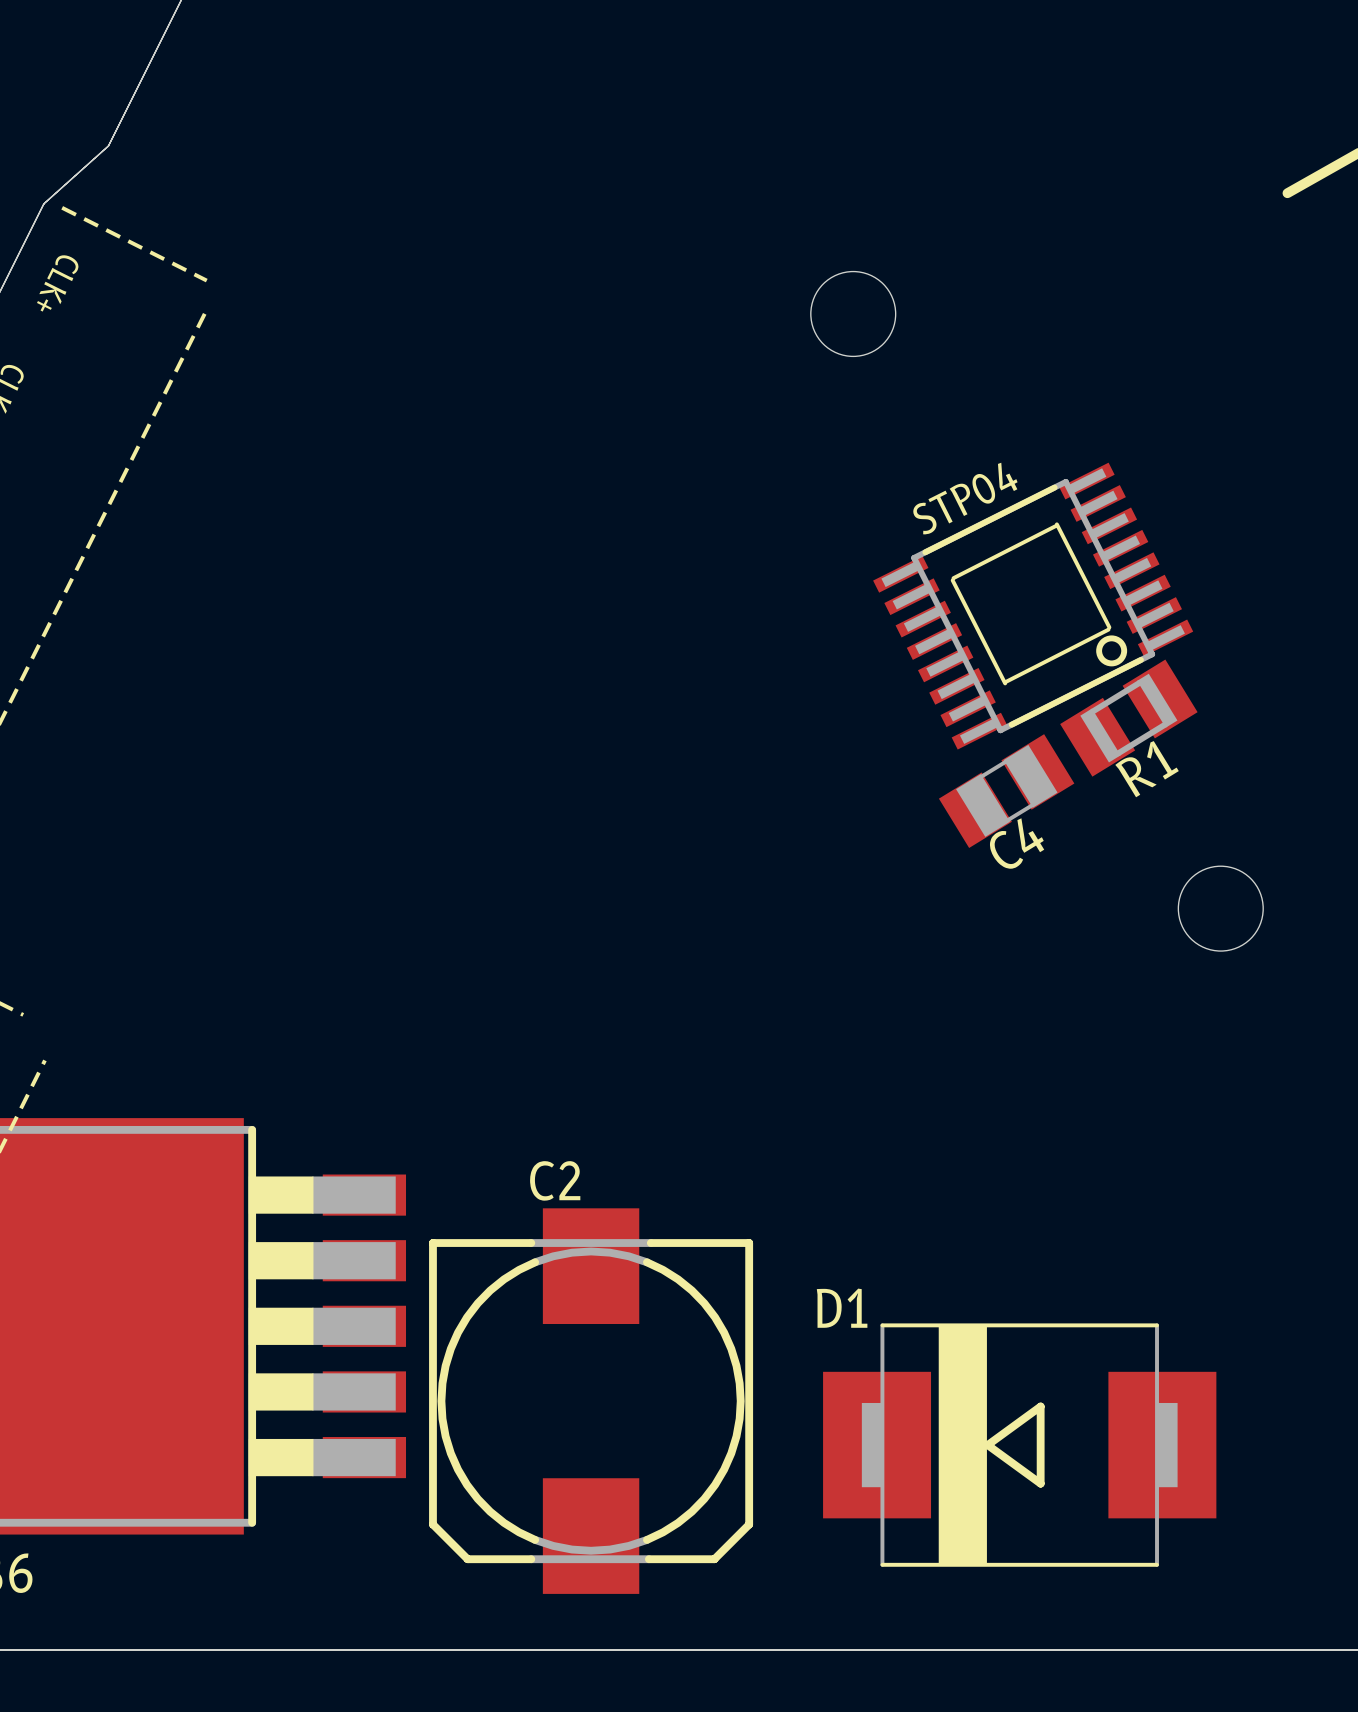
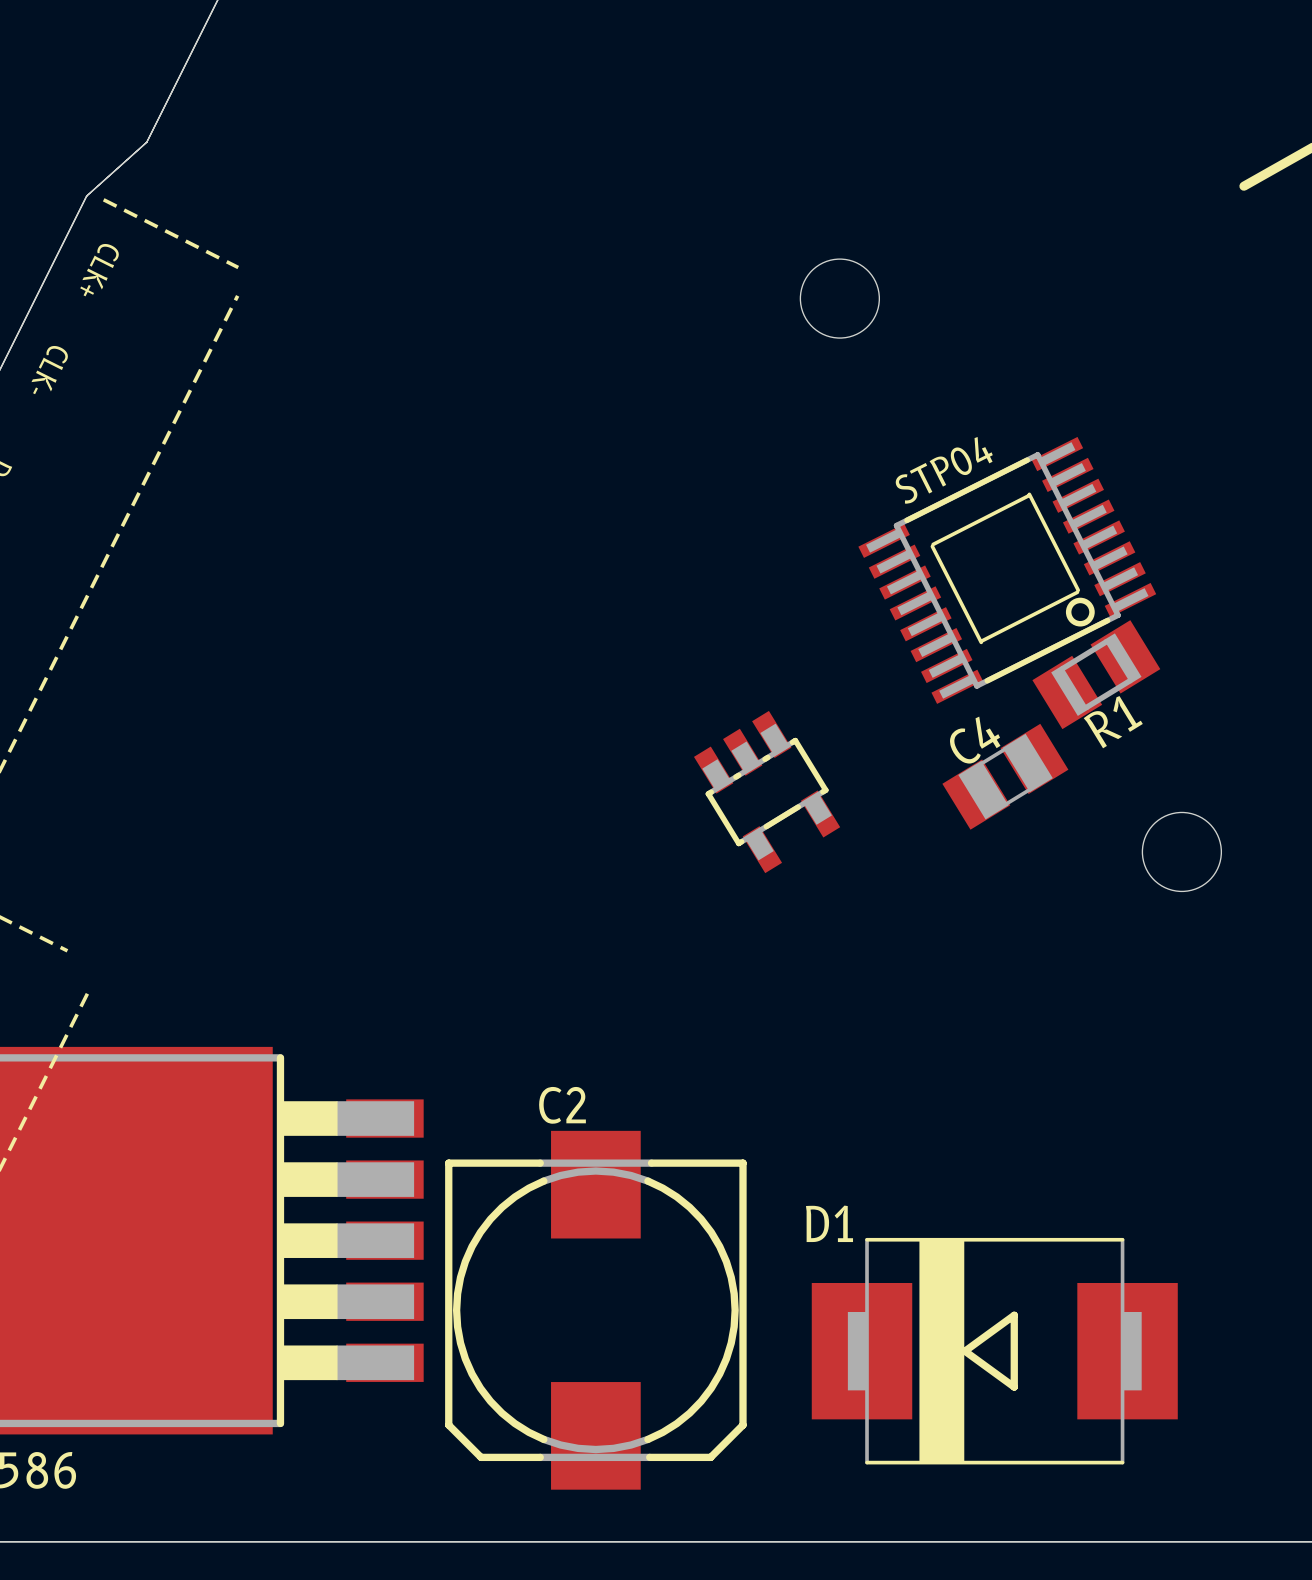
C4 position: (1006, 791) -> (1005, 776)
C4 name position: C4 (1017, 843) -> C4 (975, 740)
part: none -> (767, 792)

